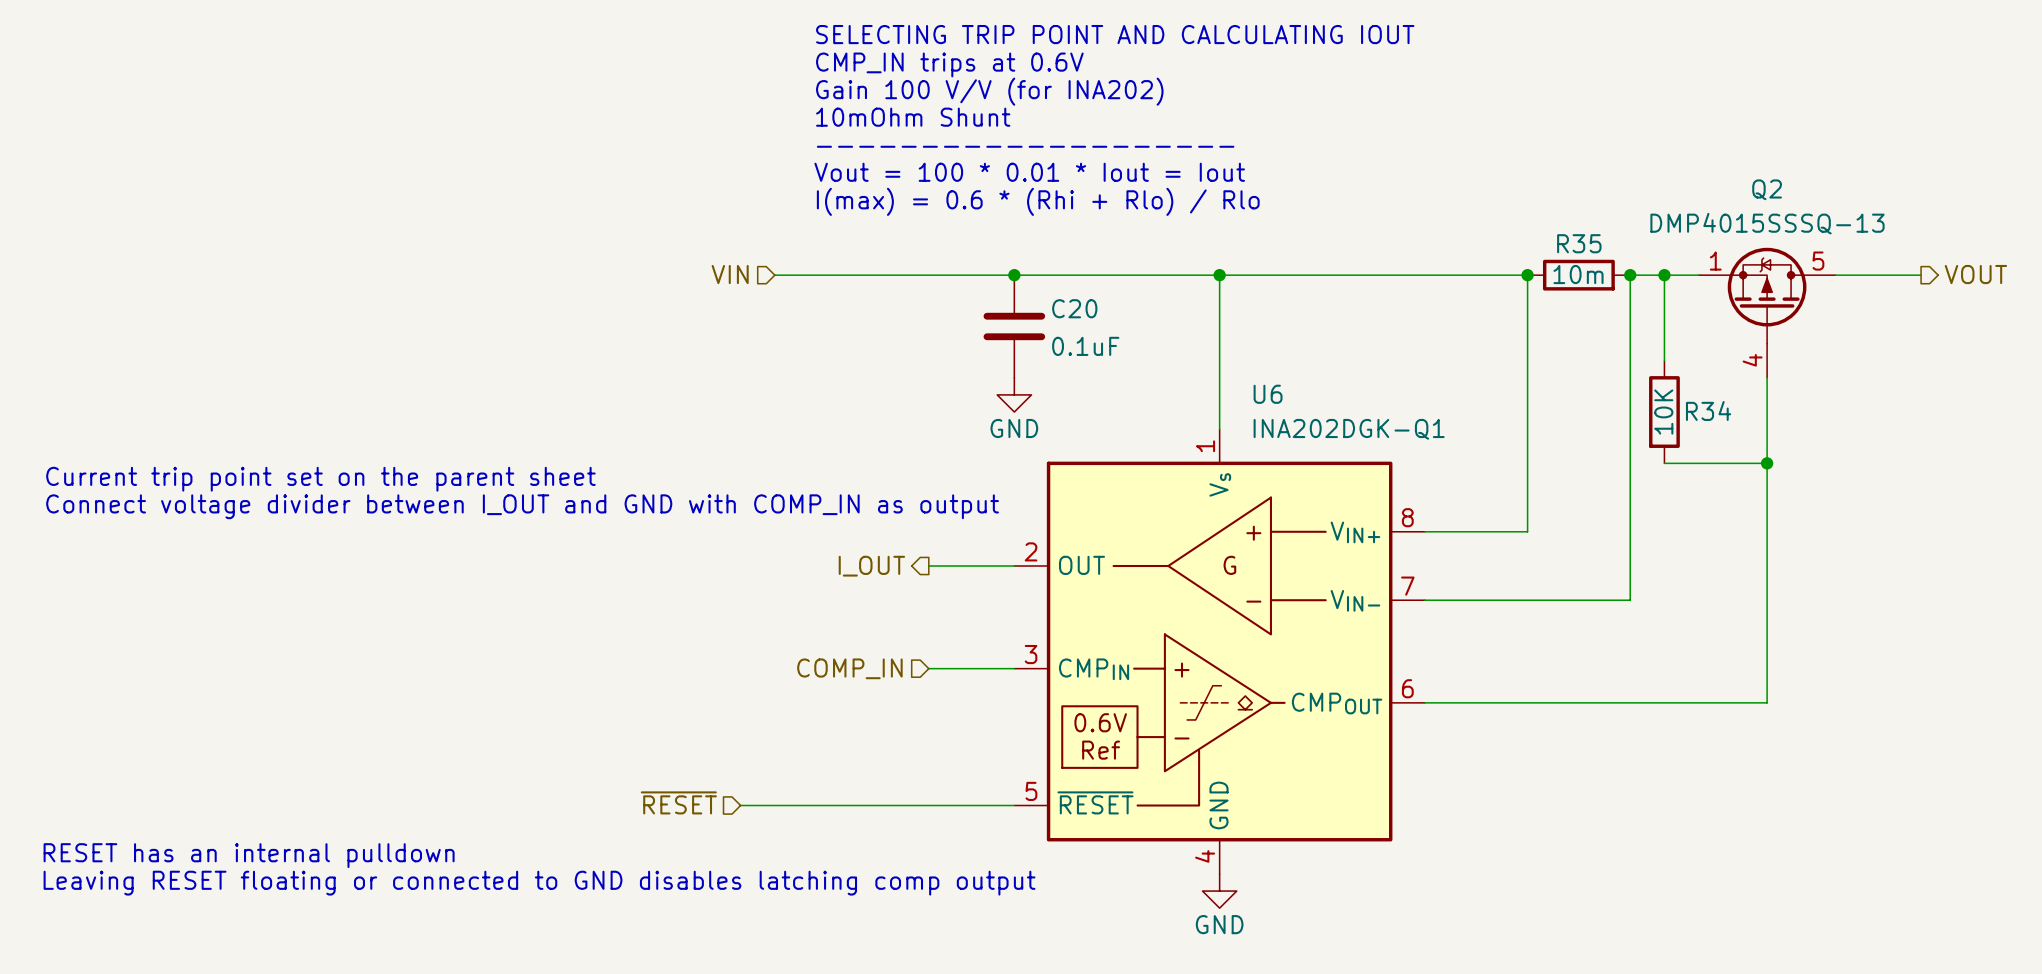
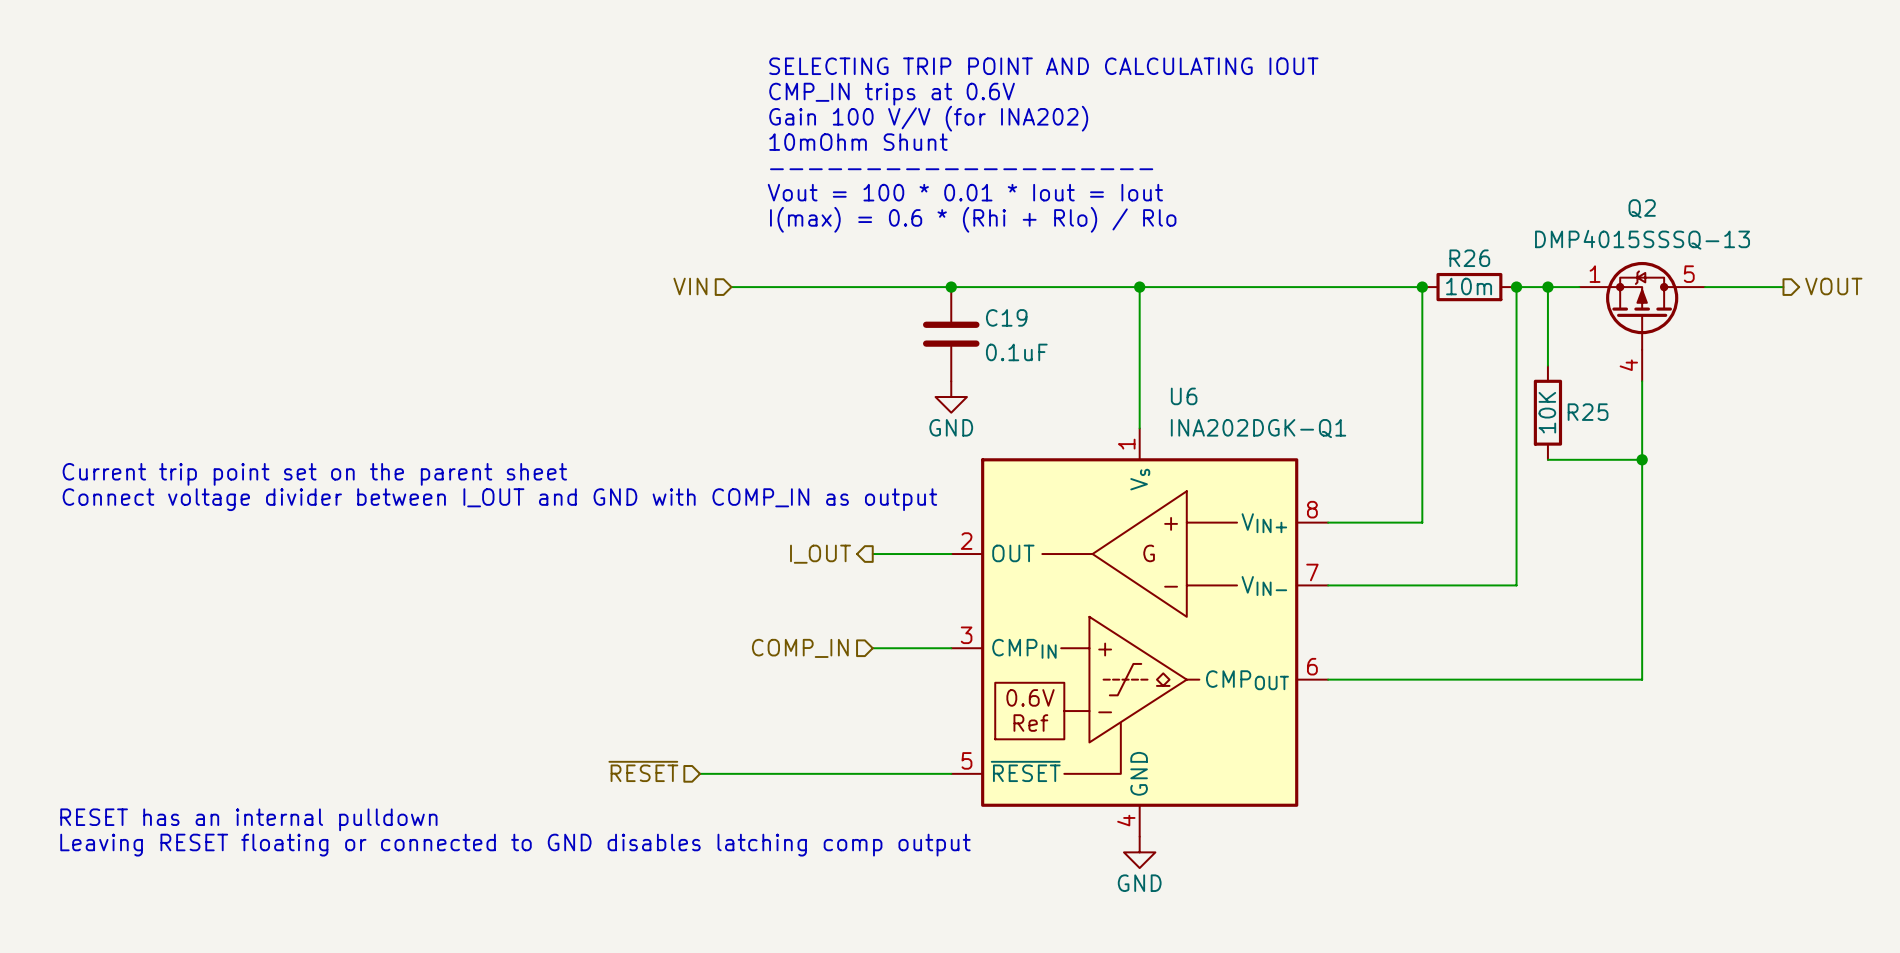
R35 name: R35 (1579, 243) -> R26 (1469, 258)
C20 name: C20 (1074, 308) -> C19 (1006, 317)
R34 name: R34 (1708, 410) -> R25 (1588, 412)

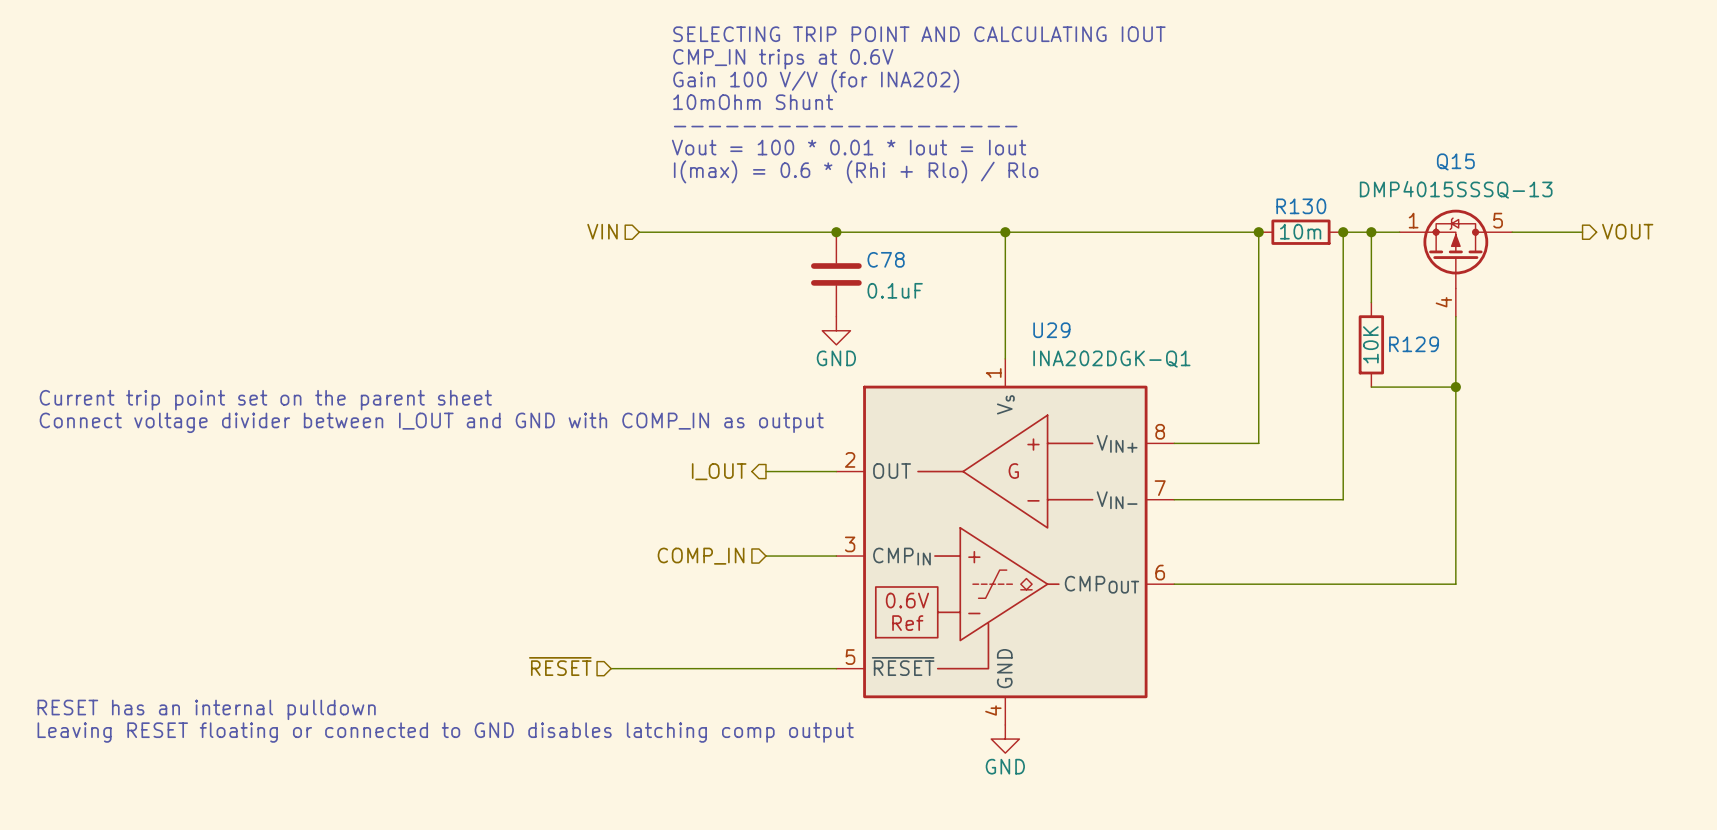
Q2 name: Q2 (1642, 208) -> Q15 (1455, 161)
R26 name: R26 (1469, 258) -> R130 (1301, 206)
C19 name: C19 (1006, 317) -> C78 (886, 259)
U6 name: U6 (1184, 396) -> U29 (1051, 330)
R25 name: R25 (1588, 412) -> R129 (1414, 344)

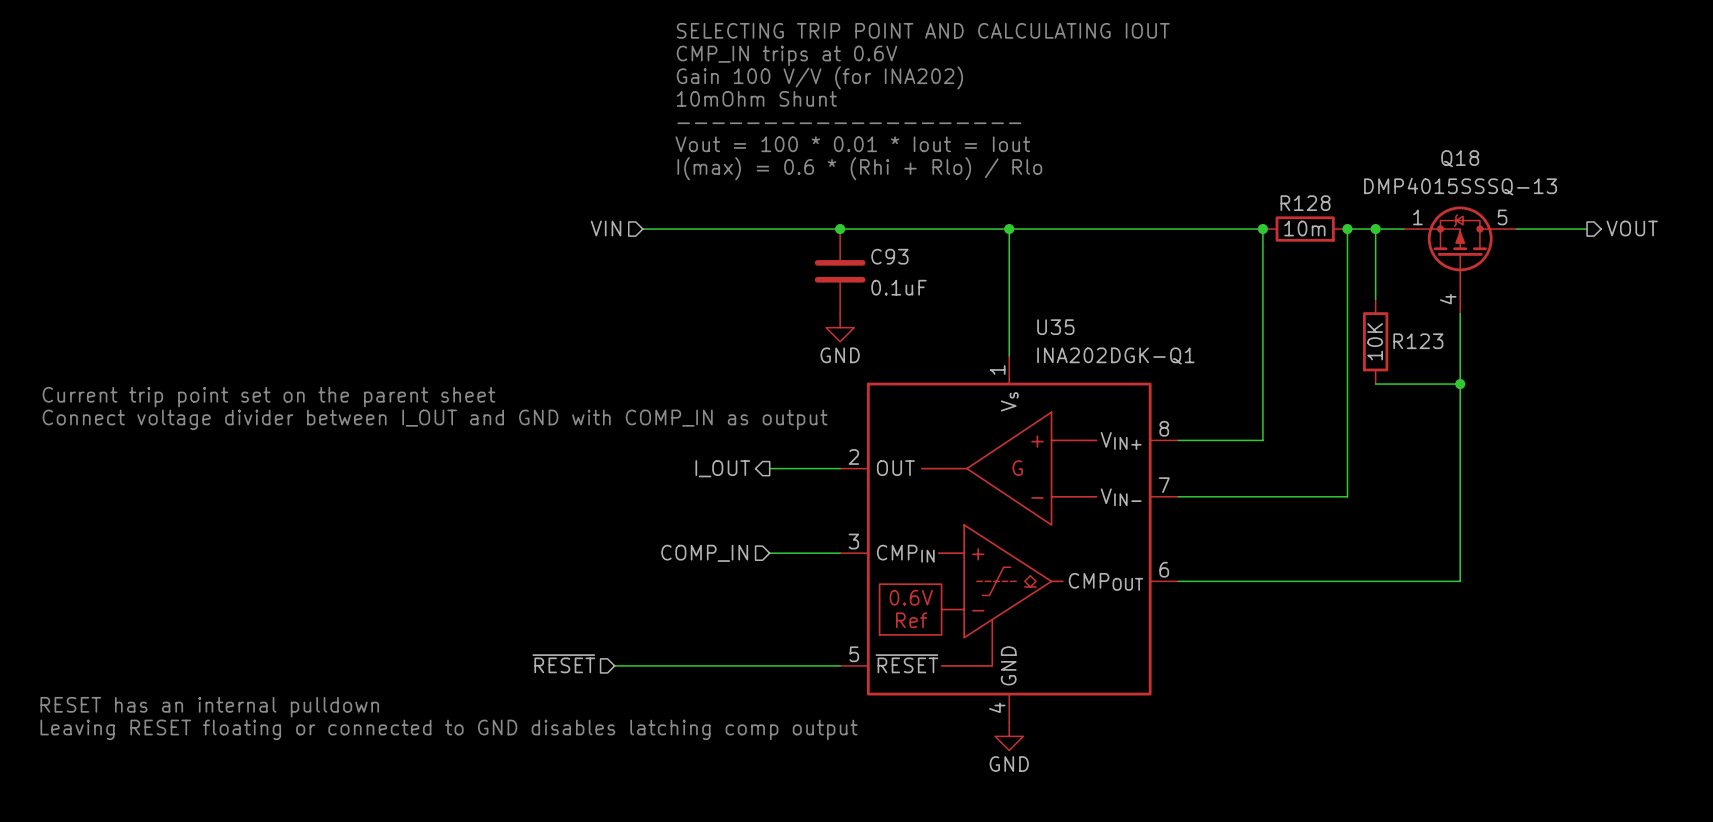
Q15 name: Q15 (1455, 161) -> Q18 (1460, 158)
R130 name: R130 (1301, 206) -> R128 (1305, 203)
C78 name: C78 (886, 259) -> C93 (889, 256)
U29 name: U29 (1051, 330) -> U35 (1055, 327)
R129 name: R129 (1414, 344) -> R123 (1418, 341)

